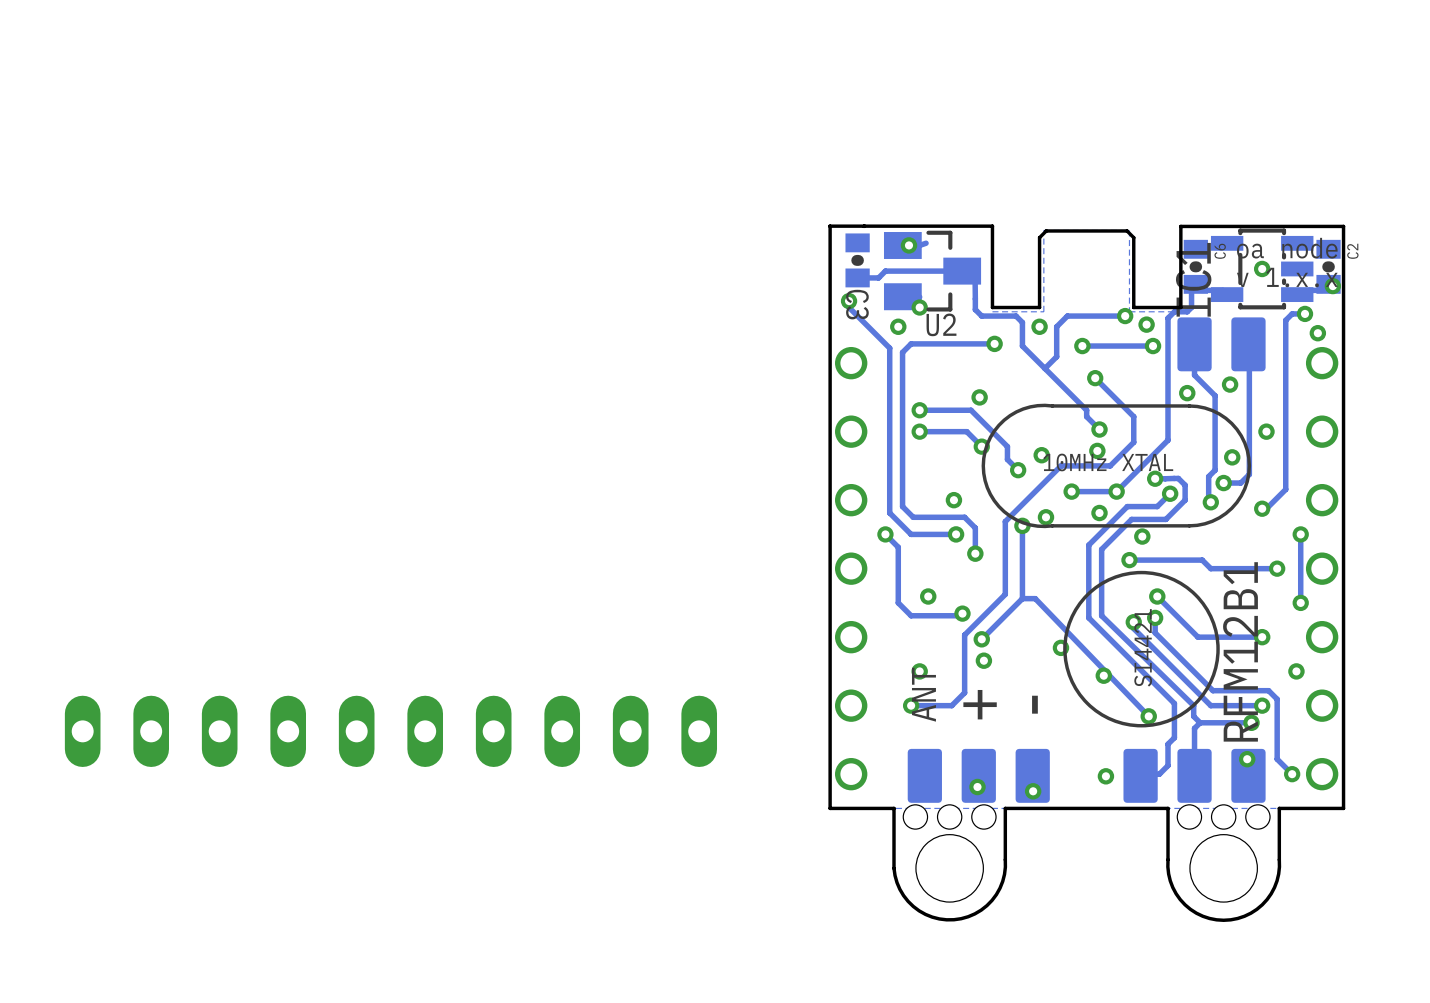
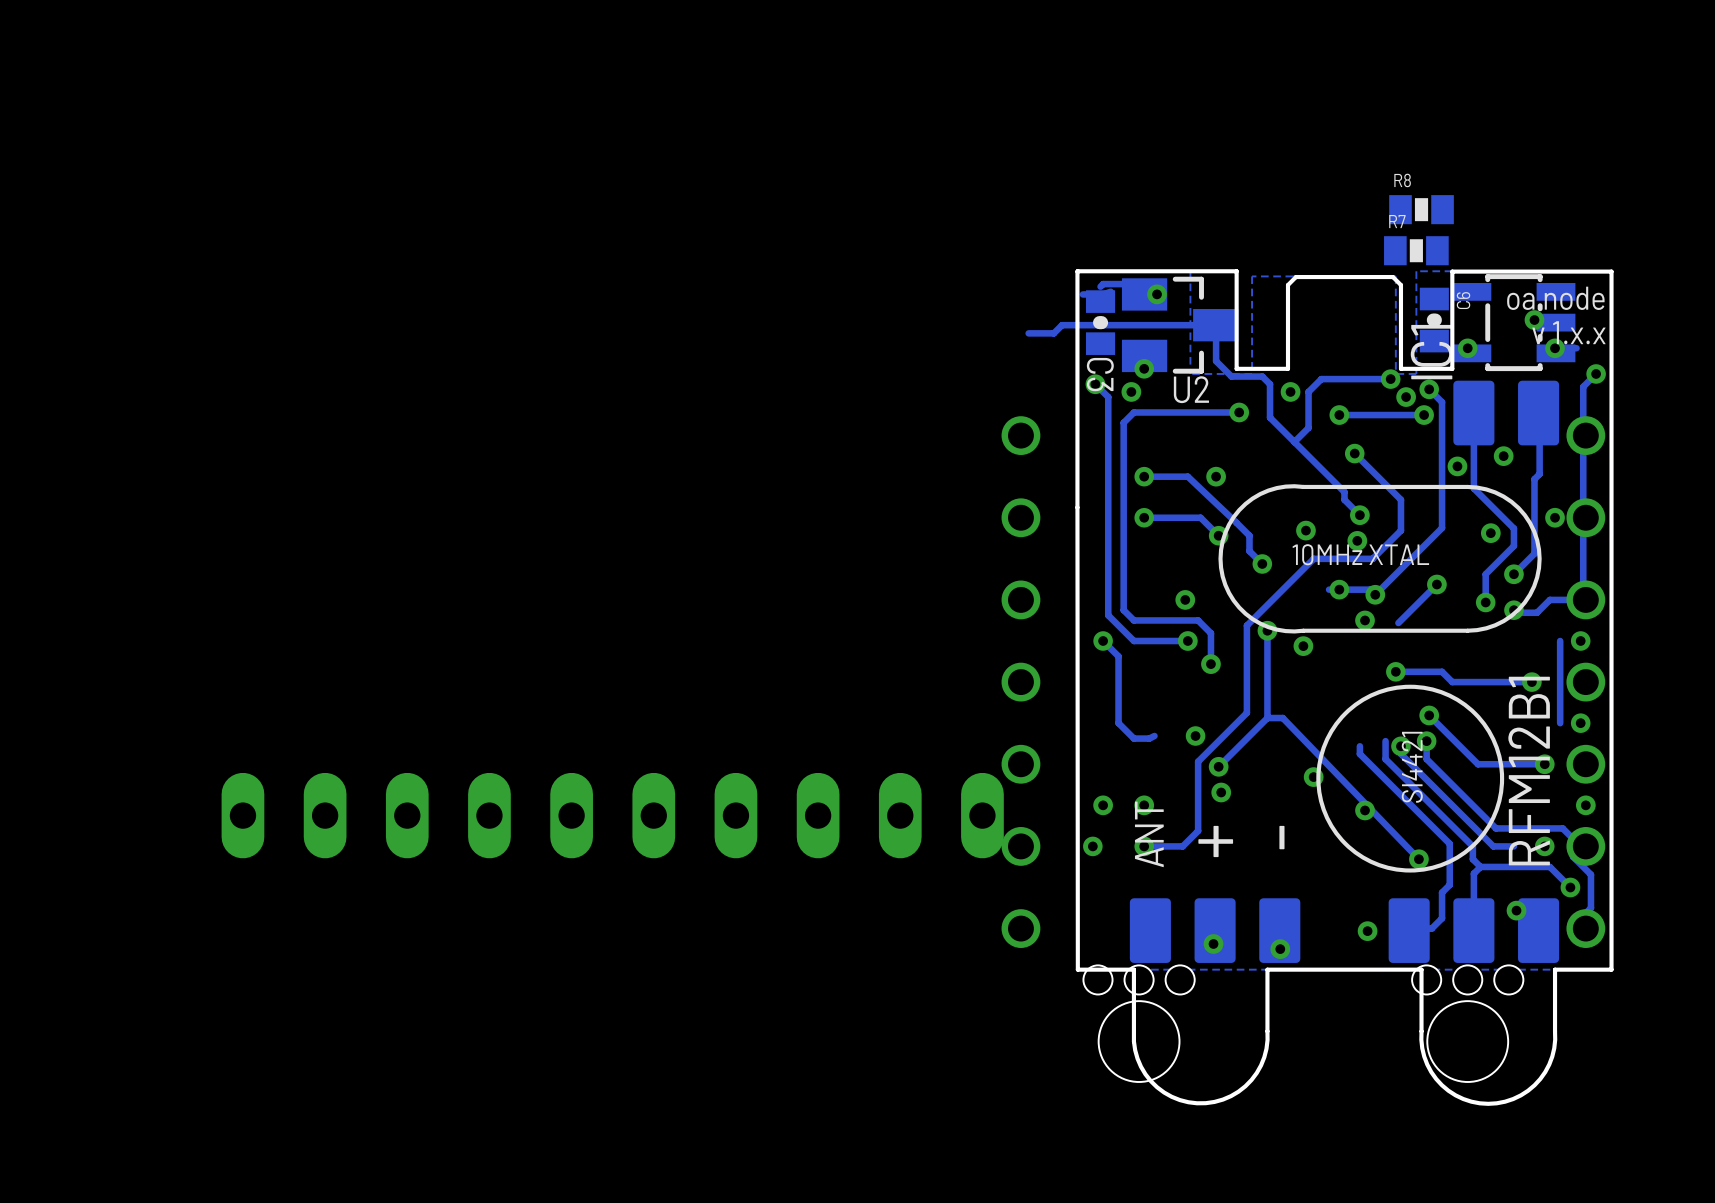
R8: none -> (1421, 209)
R7: none -> (1416, 250)
board edge: (830, 226) (830, 808) (894, 808) (894, 868) (899, 889) (908, 901) (919, 910) (932, 917) (946, 919) (961, 918) (974, 913) (986, 905) (999, 888) (1005, 867) (1005, 808) (1056, 808) -> (1077, 271) (1077, 969) (1133, 969) (1133, 1041) (1140, 1066) (1150, 1081) (1164, 1092) (1179, 1100) (1197, 1103) (1214, 1101) (1230, 1096) (1245, 1086) (1261, 1065) (1267, 1040) (1267, 969)
board edge: (898, 226) (829, 226) -> none
board edge: (992, 226) (992, 307) (1031, 307) -> (1190, 271) (1236, 271) (1236, 368)
board edge: (1210, 226) (1180, 226) (1180, 307) -> (1452, 271) (1452, 368) (1416, 368)
board edge: (1080, 230) (1046, 230) (1039, 237) (1039, 307) -> (1296, 277) (1287, 285) (1287, 368) (1246, 368)
board edge: (1127, 230) (1133, 237) (1133, 307) (1168, 307) -> (1351, 277) (1392, 277) (1400, 285) (1400, 368)
zone outline: (1129, 230) (1129, 311) (1163, 311) -> (1354, 276) (1395, 276) (1395, 373)
track: none -> (1100, 286) (1103, 284) (1134, 284) (1144, 294)
via: (908, 245) -> none
via: none -> (1157, 294)
C3 position: (857, 260) -> (1100, 322)
C2: (1328, 266) -> none
via position: (1262, 268) -> (1534, 320)
U2 position: (932, 271) -> (1180, 325)
track: none -> (1215, 325) (1154, 325)
track: none -> (1216, 325) (1216, 361) (1231, 376) (1262, 376) (1270, 384) (1270, 417) (1344, 492) (1344, 499) (1359, 515)
track: (962, 273) (962, 271) (975, 272) (975, 309) (981, 316) (1016, 316) (1022, 322) (1022, 346) (1086, 410) (1086, 416) (1099, 429) -> none
via: (1332, 286) -> none
via: none -> (1467, 348)
via: none -> (1555, 348)
track: (1227, 294) (1222, 290) (1201, 290) (1195, 284) (1191, 288) (1191, 307) (1187, 311) (1174, 311) (1168, 318) (1168, 416) -> (1354, 453) (1400, 499)
track: (849, 301) (849, 307) (889, 348) (889, 513) (911, 534) (945, 534) -> (1095, 384) (1108, 397) (1108, 615) (1133, 641)
via: (849, 301) -> none
via: (919, 307) -> none
via: none -> (1144, 368)
track: none -> (1596, 373) (1583, 386) (1583, 587) (1570, 599) (1549, 599) (1537, 612) (1511, 612)
via: none -> (1596, 373)
track: (1305, 313) (1292, 313) (1285, 320) (1285, 489) (1266, 508) (1262, 508) -> none
via: (1305, 313) -> none
track: (1101, 316) (1067, 316) (1056, 326) (1056, 356) (1044, 368) -> (1321, 379) (1308, 391) (1308, 427) (1294, 442)
via: (1125, 316) -> none
via: none -> (1095, 384)
via position: (1146, 324) -> (1390, 379)
track: none -> (1429, 389) (1442, 402) (1442, 528) (1375, 594) (1370, 589) (1339, 589)
via: none -> (1429, 389)
via: (898, 326) -> none
via: none -> (1131, 391)
via: (1039, 326) -> none
via: none -> (1290, 391)
via: none -> (1406, 397)
via: (1317, 333) -> none
track: (945, 343) (911, 343) (902, 352) (902, 506) (913, 517) (945, 517) -> (1133, 412) (1123, 422) (1123, 610) (1133, 620)
via: (994, 343) -> none
track: none -> (1239, 412) (1192, 412)
via: none -> (1239, 412)
track: (1194, 344) (1194, 375) (1215, 395) (1215, 470) (1208, 476) (1208, 495) (1210, 502) -> none
track: none -> (1473, 413) (1473, 488) (1513, 528) (1513, 546) (1485, 574) (1485, 602)
track: (1248, 344) (1249, 474) (1240, 483) (1223, 483) -> none
track: none -> (1538, 413) (1539, 474) (1534, 479) (1534, 553) (1513, 574)
via: (1082, 346) -> none
track: (1116, 346) (1082, 346) -> (1390, 379) (1349, 379)
via: none -> (1339, 415)
via: (1153, 346) -> none
via: none -> (1424, 415)
track: (1095, 378) (1133, 416) (1133, 442) (1110, 465) -> none
via: (1095, 378) -> none
via: none -> (1354, 453)
via: none -> (1503, 456)
via position: (1230, 384) -> (1457, 466)
via: (1187, 393) -> none
track: none -> (1144, 476) (1187, 476) (1249, 535) (1249, 551) (1262, 563)
via: none -> (1144, 476)
via: (979, 397) -> none
via: none -> (1216, 476)
track: (919, 410) (971, 410) (1007, 446) (1007, 459) (1018, 470) -> none
via: (919, 410) -> none
via: (1099, 429) -> none
via: none -> (1359, 515)
via: (919, 431) -> none
track: (953, 431) (919, 431) -> (1187, 641) (1146, 641)
via: none -> (1144, 517)
track: (966, 431) (981, 446) -> (1159, 517) (1200, 517) (1218, 535)
via: (1266, 431) -> none
via: none -> (1555, 517)
track: (1168, 440) (1116, 491) -> (1400, 528) (1400, 530) (1372, 558) (1331, 558)
via: none -> (1305, 530)
via: (981, 446) -> none
via: none -> (1218, 535)
via: (1097, 450) -> none
via: none -> (1357, 540)
via position: (1041, 455) -> (1262, 563)
via position: (1232, 457) -> (1490, 533)
track: (1095, 465) (1060, 465) (1005, 521) (1005, 594) (964, 635) (964, 692) (951, 705) (911, 705) -> (1313, 558) (1246, 625) (1246, 712) (1198, 761) (1198, 831) (1182, 846) (1144, 846)
via: (1018, 470) -> none
track: (1155, 478) (1178, 478) (1185, 485) (1185, 500) -> (1436, 584) (1421, 599)
via: (1155, 478) -> none
via: none -> (1513, 574)
via: (1223, 483) -> none
via: (1071, 491) -> none
track: (1108, 491) (1071, 491) -> none
track: (1170, 493) (1157, 506) (1127, 506) (1088, 545) (1088, 617) (1174, 703) (1174, 737) (1168, 744) (1168, 765) (1159, 774) (1142, 774) (1140, 775) (1146, 775) -> none
via: (1170, 493) -> none
via: none -> (1375, 594)
via: (953, 500) -> none
via: none -> (1185, 599)
via position: (1210, 502) -> (1436, 584)
via: none -> (1485, 602)
via: (1099, 513) -> none
track: (964, 517) (975, 527) (975, 553) -> (1157, 620) (1198, 620) (1210, 633) (1210, 664)
via position: (1045, 517) -> (1267, 630)
via: none -> (1365, 620)
track: (1165, 519) (1131, 519) (1101, 549) (1101, 615) (1193, 705) (1193, 716) (1200, 722) -> none
track: (1022, 525) (1022, 598) -> (1267, 630) (1267, 718)
via: (1022, 525) -> none
track: (885, 534) (898, 547) (898, 602) (911, 615) (945, 615) -> (1103, 641) (1118, 656) (1118, 723) (1133, 738)
via: (885, 534) -> none
via: none -> (1103, 641)
via: (956, 534) -> none
via: none -> (1187, 641)
via position: (1300, 534) -> (1580, 641)
via: (1142, 536) -> none
via: none -> (1303, 646)
via: (975, 553) -> none
via: none -> (1210, 664)
RFM12B1 position: (1086, 560) -> (1344, 671)
via: (1129, 560) -> none
track: (1163, 560) (1129, 560) -> (1424, 415) (1383, 415)
via: none -> (1395, 671)
via: (928, 596) -> none
track: (1157, 596) (1197, 637) (1232, 637) -> (1429, 715) (1478, 764)
via: (1157, 596) -> none
via: none -> (1429, 715)
track: (1022, 598) (981, 639) -> (1267, 718) (1218, 766)
track: (1022, 598) (1035, 598) (1148, 716) -> (1267, 718) (1282, 718) (1418, 859)
via position: (1300, 602) -> (1580, 723)
via: (962, 613) -> none
via: none -> (1195, 736)
via position: (1155, 617) -> (1400, 746)
via: none -> (1426, 741)
via: (1133, 622) -> none
via: (1262, 637) -> none
track: none -> (1544, 764) (1513, 764)
via: none -> (1544, 764)
via: (981, 639) -> none
via: none -> (1218, 766)
via: (1060, 647) -> none
via: none -> (1313, 777)
via: (983, 660) -> none
via: none -> (1221, 792)
via: none -> (1144, 805)
via: (1296, 671) -> none
via: none -> (1585, 805)
via: (1103, 675) -> none
via: none -> (1365, 810)
track: none -> (1454, 828) (1472, 846) (1472, 859) (1480, 866) (1473, 873) (1473, 930)
track: (1247, 690) (1212, 690) -> (1495, 828) (1426, 759) (1426, 741)
track: (1268, 690) (1277, 699) (1277, 759) (1292, 774) -> (1521, 828) (1562, 828) (1573, 838) (1573, 856) (1590, 874) (1590, 908) (1570, 928)
track: (1208, 703) (1210, 705) (1245, 705) -> (1400, 746) (1400, 753) (1493, 846)
track: none -> (1449, 843) (1449, 884) (1442, 892) (1442, 918) (1431, 928) (1411, 928) (1409, 930) (1416, 930)
via: none -> (1144, 846)
via: (1262, 705) -> none
via: none -> (1544, 846)
via: (1148, 716) -> none
via: none -> (1418, 859)
track: (1200, 722) (1194, 728) (1194, 775) -> none
track: (1234, 722) (1200, 722) -> none
track: none -> (1501, 866) (1549, 866) (1570, 887)
via: (1251, 722) -> none
part position: (390, 731) -> (612, 815)
via: none -> (1570, 887)
via: (1247, 759) -> none
via: none -> (1516, 910)
via: (1292, 774) -> none
via: (1105, 776) -> none
via: none -> (1367, 931)
via: (977, 787) -> none
via: none -> (1213, 943)
via: (1033, 791) -> none
via: none -> (1280, 949)
board edge: (1296, 808) (1279, 808) (1279, 866) (1277, 880) (1271, 893) (1262, 904) (1250, 913) (1237, 918) (1223, 920) (1209, 918) (1196, 913) (1180, 899) (1172, 887) (1167, 866) (1168, 808) -> (1555, 969) (1555, 1039) (1549, 1064) (1540, 1078) (1520, 1095) (1505, 1101) (1488, 1103) (1471, 1101) (1455, 1095) (1441, 1085) (1431, 1072) (1424, 1056) (1421, 1039) (1421, 969) (1400, 969)

